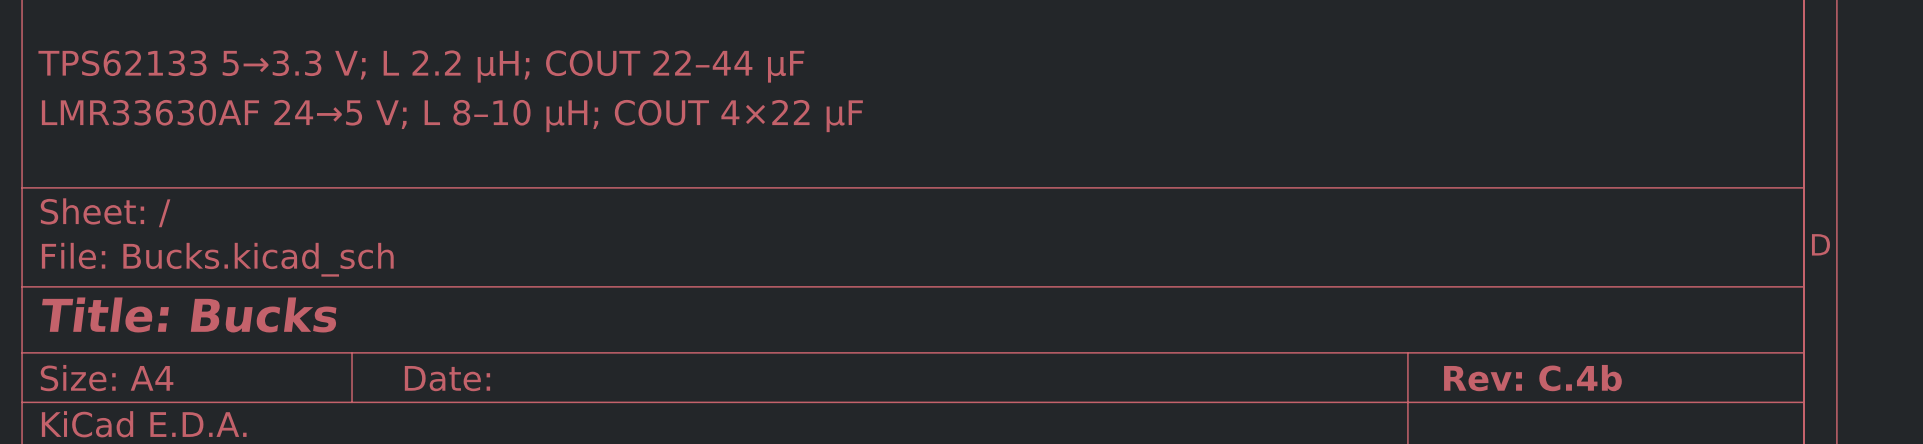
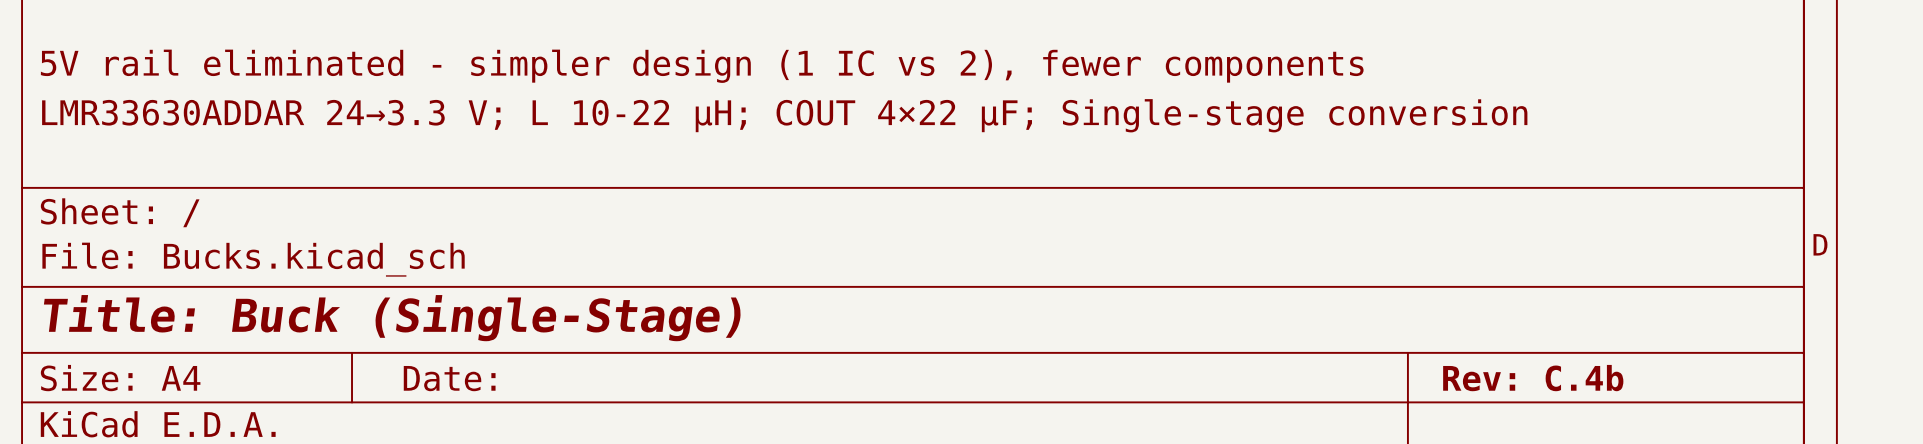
title block: TPS62133 5→3.3 V; L 2.2 µH; COUT 22–44 µF (421, 66) -> 5V rail eliminated - simpler design (1 IC vs 2), fewer components (702, 66)
title block: LMR33630AF 24→5 V; L 8–10 µH; COUT 4×22 µF (452, 116) -> LMR33630ADDAR 24→3.3 V; L 10-22 µH; COUT 4×22 µF; Single-stage conversion (784, 115)
title block: Title: Bucks (189, 314) -> Title: Buck (Single-Stage) (392, 318)

